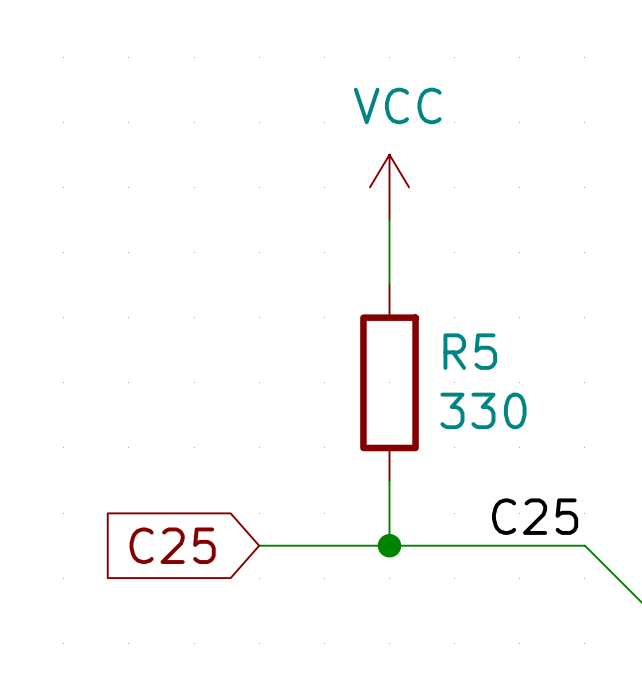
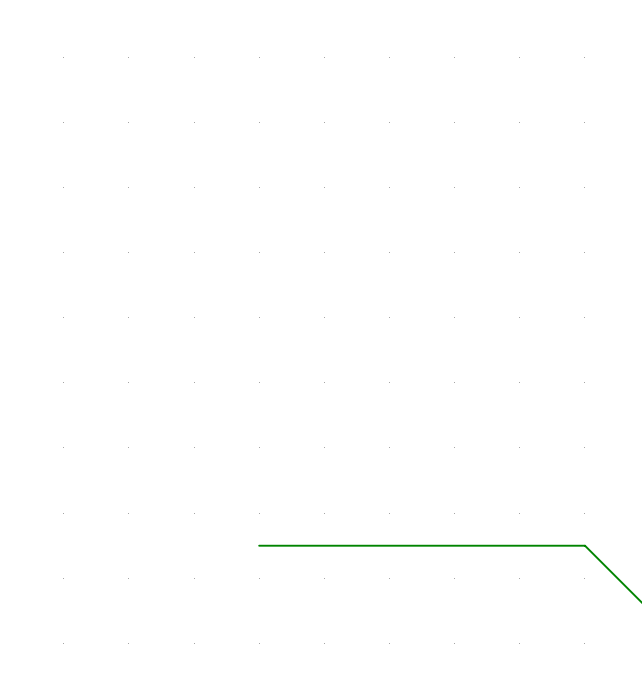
power symbol: VCC (389, 187) -> none
wire: (389, 219) (389, 285) -> none
R5: 330 (389, 382) -> none
wire: (389, 480) (389, 545) -> none
label: C25 (535, 516) -> none
global label: C25 (172, 545) -> none
junction: (389, 545) -> none

